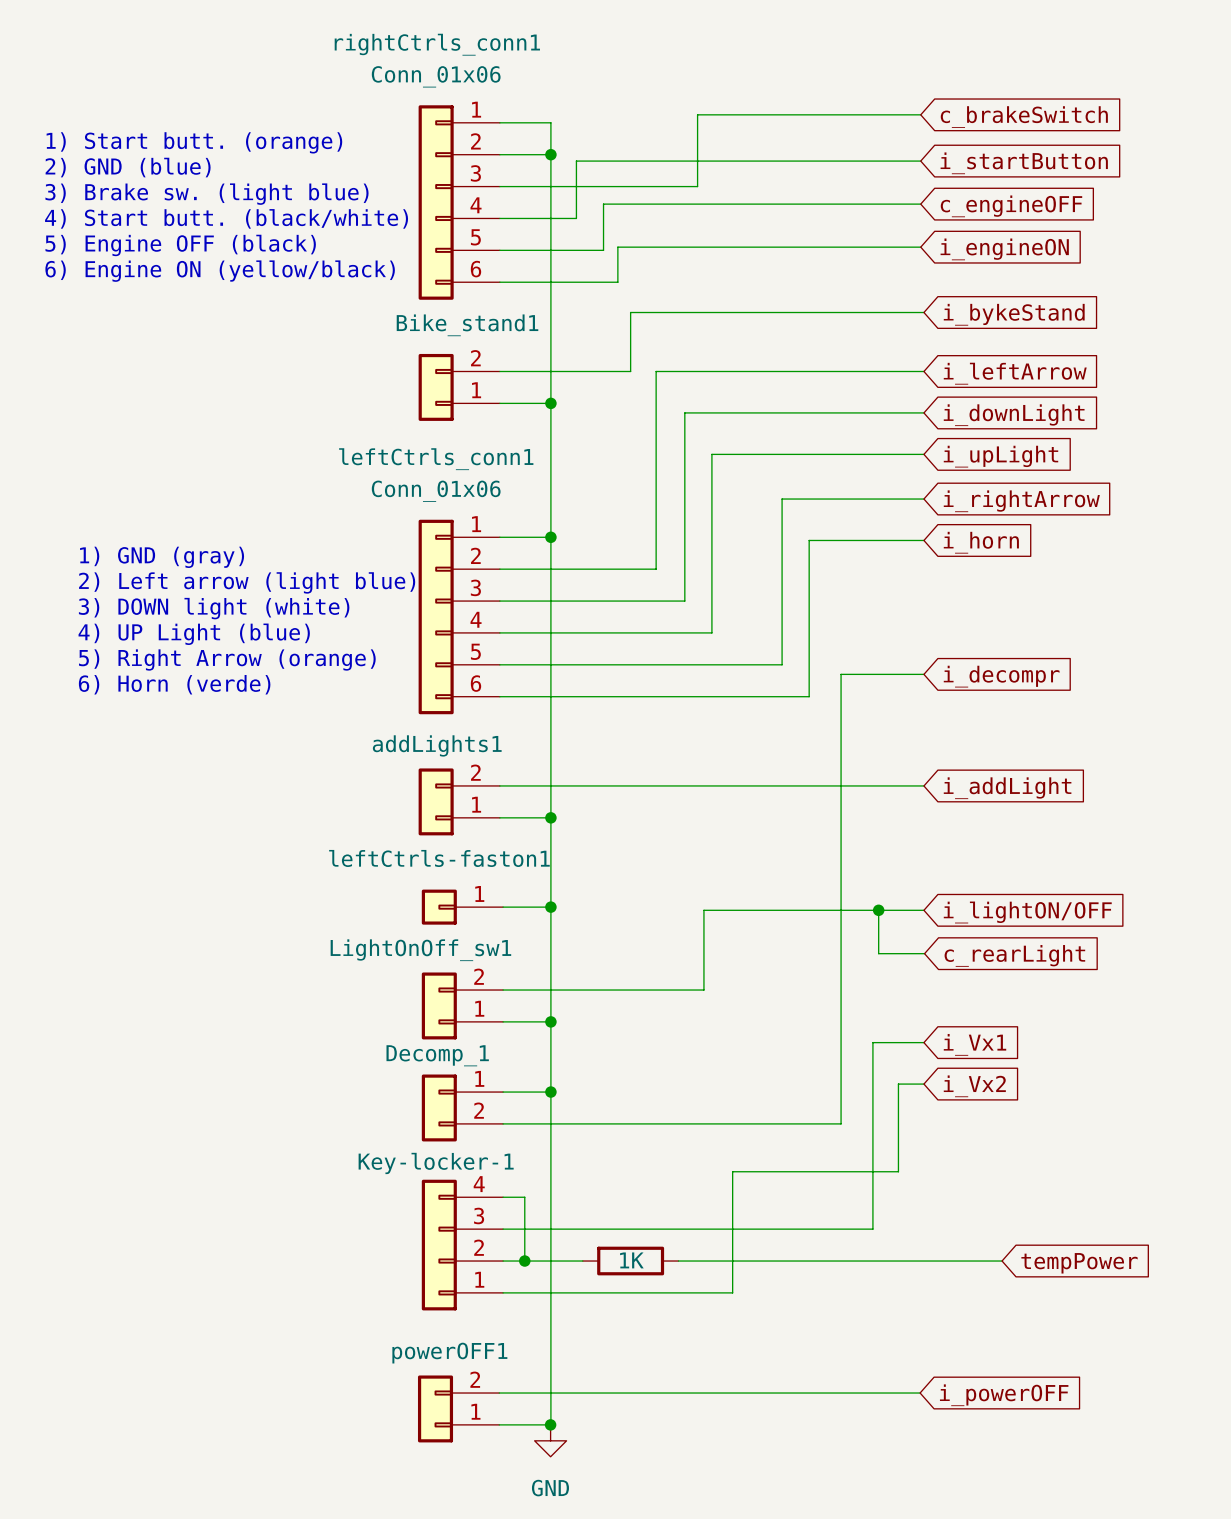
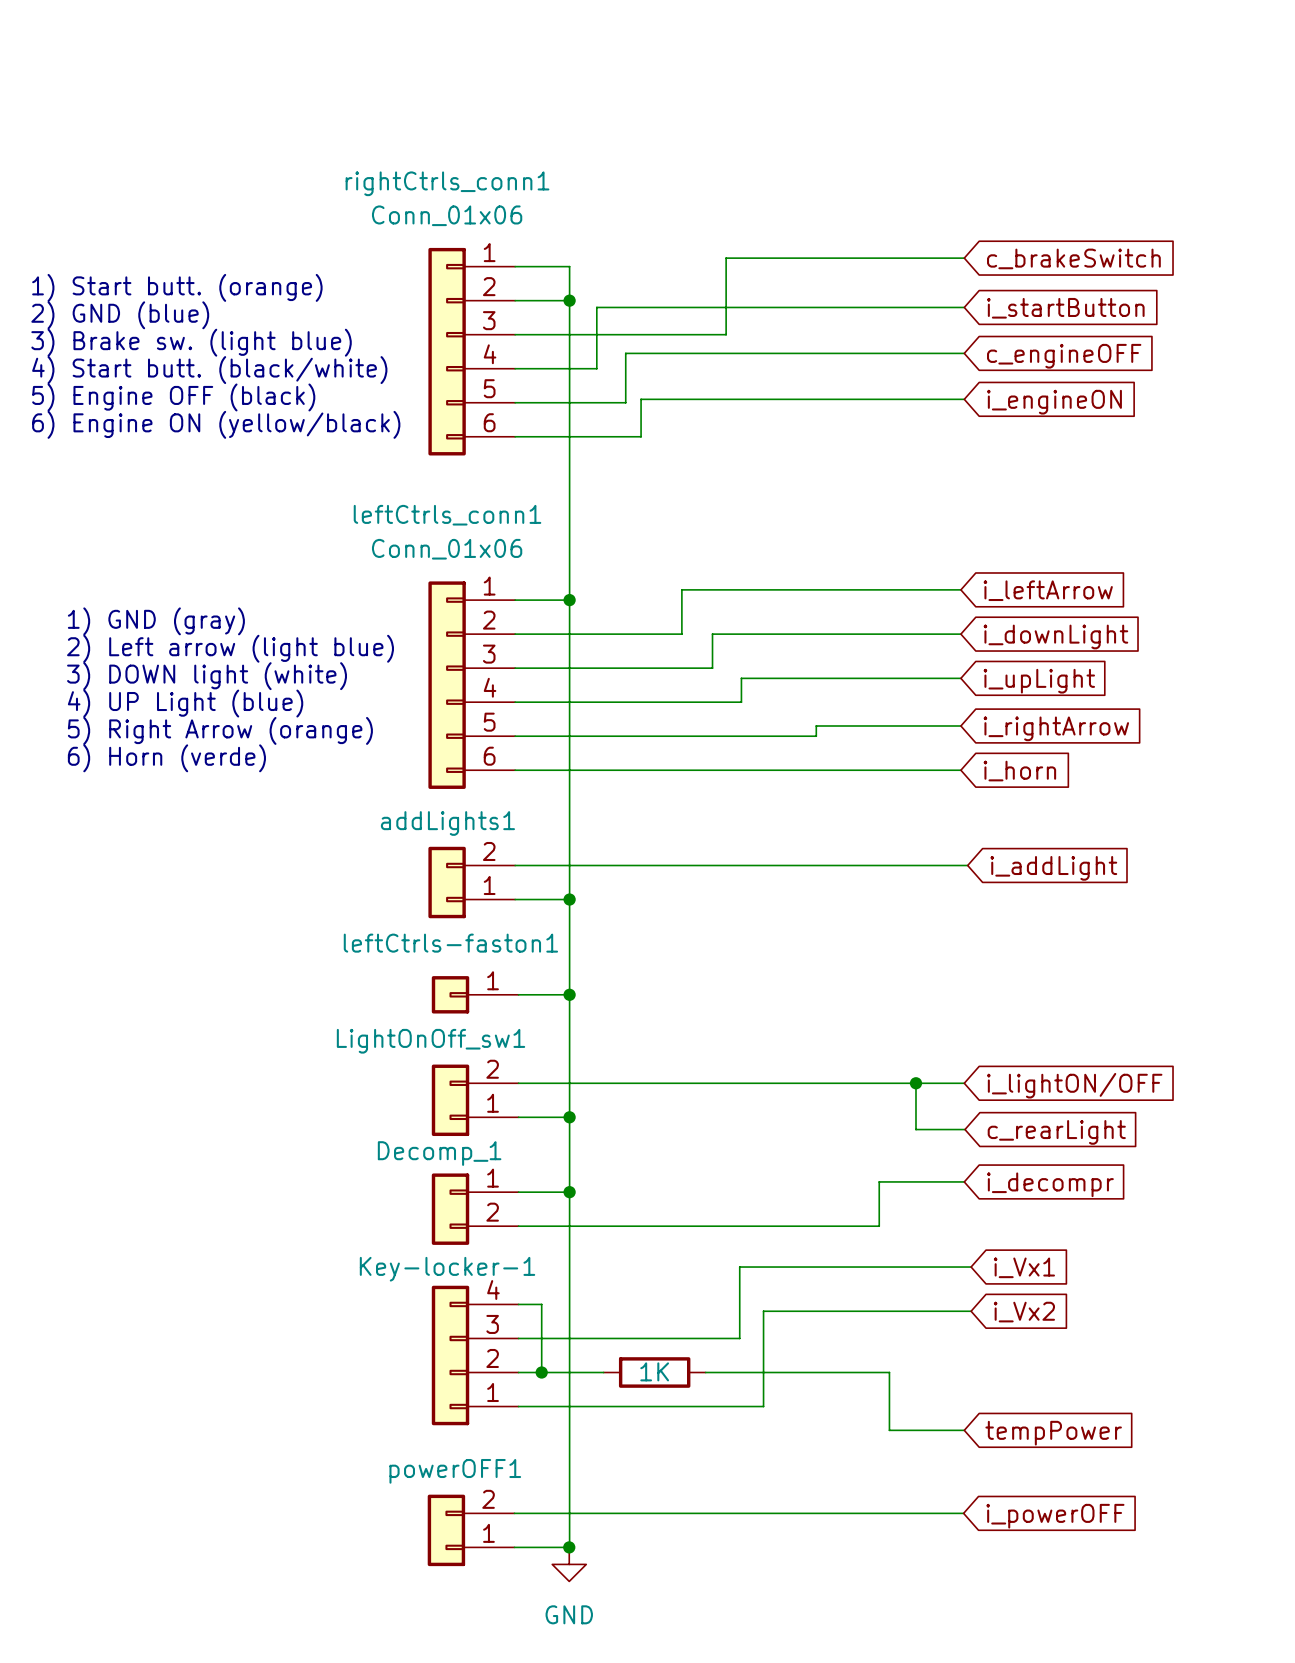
wire: (920, 114) (697, 114) (697, 186) (499, 186) -> (964, 258) (726, 258) (726, 334) (515, 334)
global label position: c_brakeSwitch (1024, 117) -> c_brakeSwitch (1073, 258)
wire: (499, 122) (550, 122) (550, 224) -> (515, 266) (569, 266)
text: 1) Start butt. (orange) (194, 142) -> none
wire: (499, 154) (550, 154) -> (515, 300) (569, 300)
junction: (550, 154) -> none
wire: (920, 161) (576, 161) (576, 218) (499, 218) -> (964, 307) (596, 307) (596, 368) (515, 368)
global label position: i_startButton (1024, 163) -> i_startButton (1065, 308)
text: 2) GND (blue) (128, 167) -> none
text position: 3) Brake sw. (light blue) (207, 194) -> 3) Brake sw. (light blue) (191, 342)
rightCtrls_conn1 position: (459, 202) -> (471, 351)
wire: (920, 204) (603, 204) (603, 250) (499, 250) -> (964, 353) (625, 353) (625, 402) (515, 402)
global label position: c_engineOFF (1011, 206) -> c_engineOFF (1064, 356)
text position: 4) Start butt. (black/white) (226, 218) -> 4) Start butt. (black/white) (209, 370)
text: 5) Engine OFF (black) (180, 245) -> 1) Start butt. (orange) (177, 287)
wire: (920, 247) (617, 247) (617, 282) (499, 282) -> (964, 399) (641, 399) (641, 436) (515, 436)
global label position: i_engineON (1004, 249) -> i_engineON (1054, 402)
junction: none -> (569, 300)
text: 6) Engine ON (yellow/black) (220, 271) -> 2) GND (blue) (120, 315)
wire: (923, 312) (630, 312) (630, 371) (499, 371) -> none
global label: i_bykeStand (1014, 314) -> none
text: none -> 5) Engine OFF (black) (173, 397)
wire: (923, 371) (656, 371) (656, 527) -> (960, 589) (681, 589)
text: none -> 6) Engine ON (yellow/black) (216, 424)
global label position: i_leftArrow (1015, 373) -> i_leftArrow (1048, 590)
Bike_stand1: (459, 387) -> none
wire: (499, 403) (550, 403) -> none
junction: (550, 403) -> none
wire: (923, 412) (684, 412) (684, 569) -> (960, 634) (712, 634)
global label position: i_downLight (1014, 415) -> i_downLight (1055, 636)
wire: (923, 454) (711, 454) (711, 610) -> (960, 678) (741, 678)
global label position: i_upLight (1000, 456) -> i_upLight (1039, 681)
wire: (923, 499) (782, 499) (782, 655) -> (960, 725) (816, 725)
global label position: i_rightArrow (1021, 501) -> i_rightArrow (1056, 728)
wire: (923, 540) (809, 540) (809, 696) -> (960, 770) (845, 770)
global label position: i_horn (981, 542) -> i_horn (1019, 771)
wire: (923, 674) (841, 674) (841, 1082) -> (964, 1181) (879, 1181)
global label: i_decompr (1001, 676) -> none
wire: (878, 910) (878, 953) (924, 953) -> (915, 1083) (915, 1129) (964, 1129)
junction: (878, 910) -> none
wire: (923, 910) (703, 910) (703, 990) -> (964, 1083) (732, 1083)
global label position: i_lightON/OFF (1027, 912) -> i_lightON/OFF (1074, 1085)
global label position: c_rearLight (1014, 955) -> c_rearLight (1056, 1132)
junction: none -> (915, 1083)
wire: (923, 1042) (872, 1042) (872, 1229) (710, 1229) -> (971, 1267) (739, 1267) (739, 1338)
global label position: i_Vx1 (975, 1044) -> i_Vx1 (1024, 1267)
wire: (923, 1084) (898, 1084) (898, 1171) (732, 1171) (732, 1203) -> (971, 1311) (763, 1311)
global label: none -> i_decompr (1050, 1184)
global label position: i_Vx2 (974, 1086) -> i_Vx2 (1024, 1312)
wire: (850, 1261) (1002, 1261) -> (889, 1372) (889, 1430) (964, 1430)
global label position: tempPower (1079, 1263) -> tempPower (1053, 1433)

